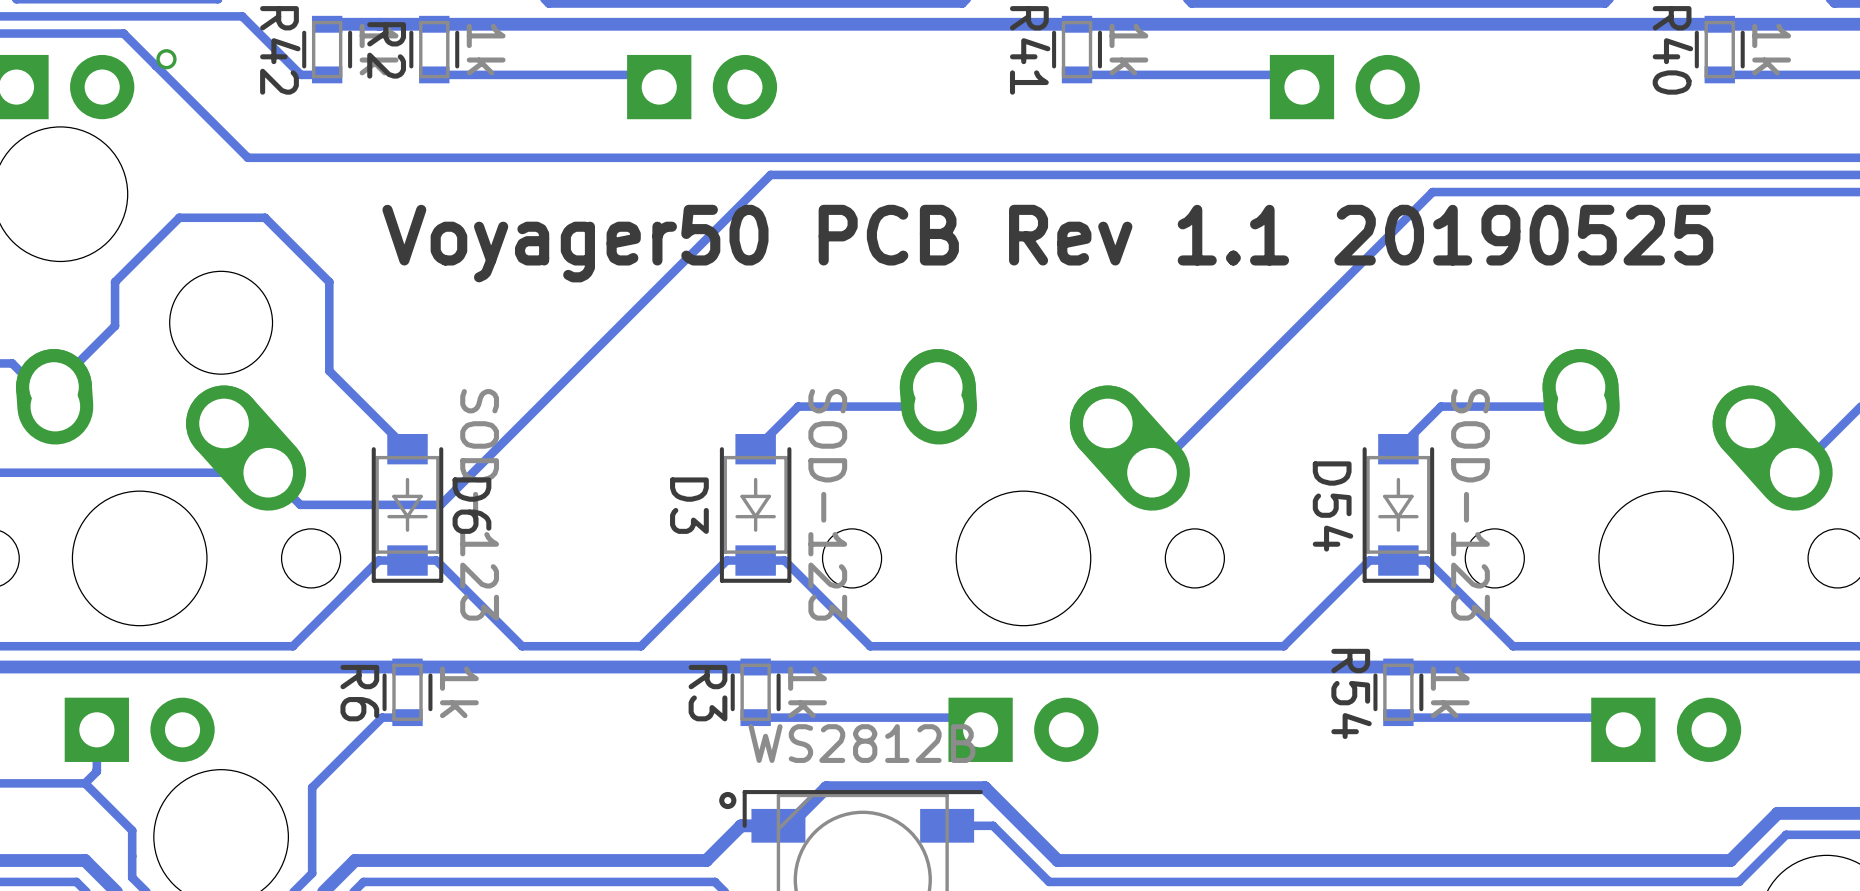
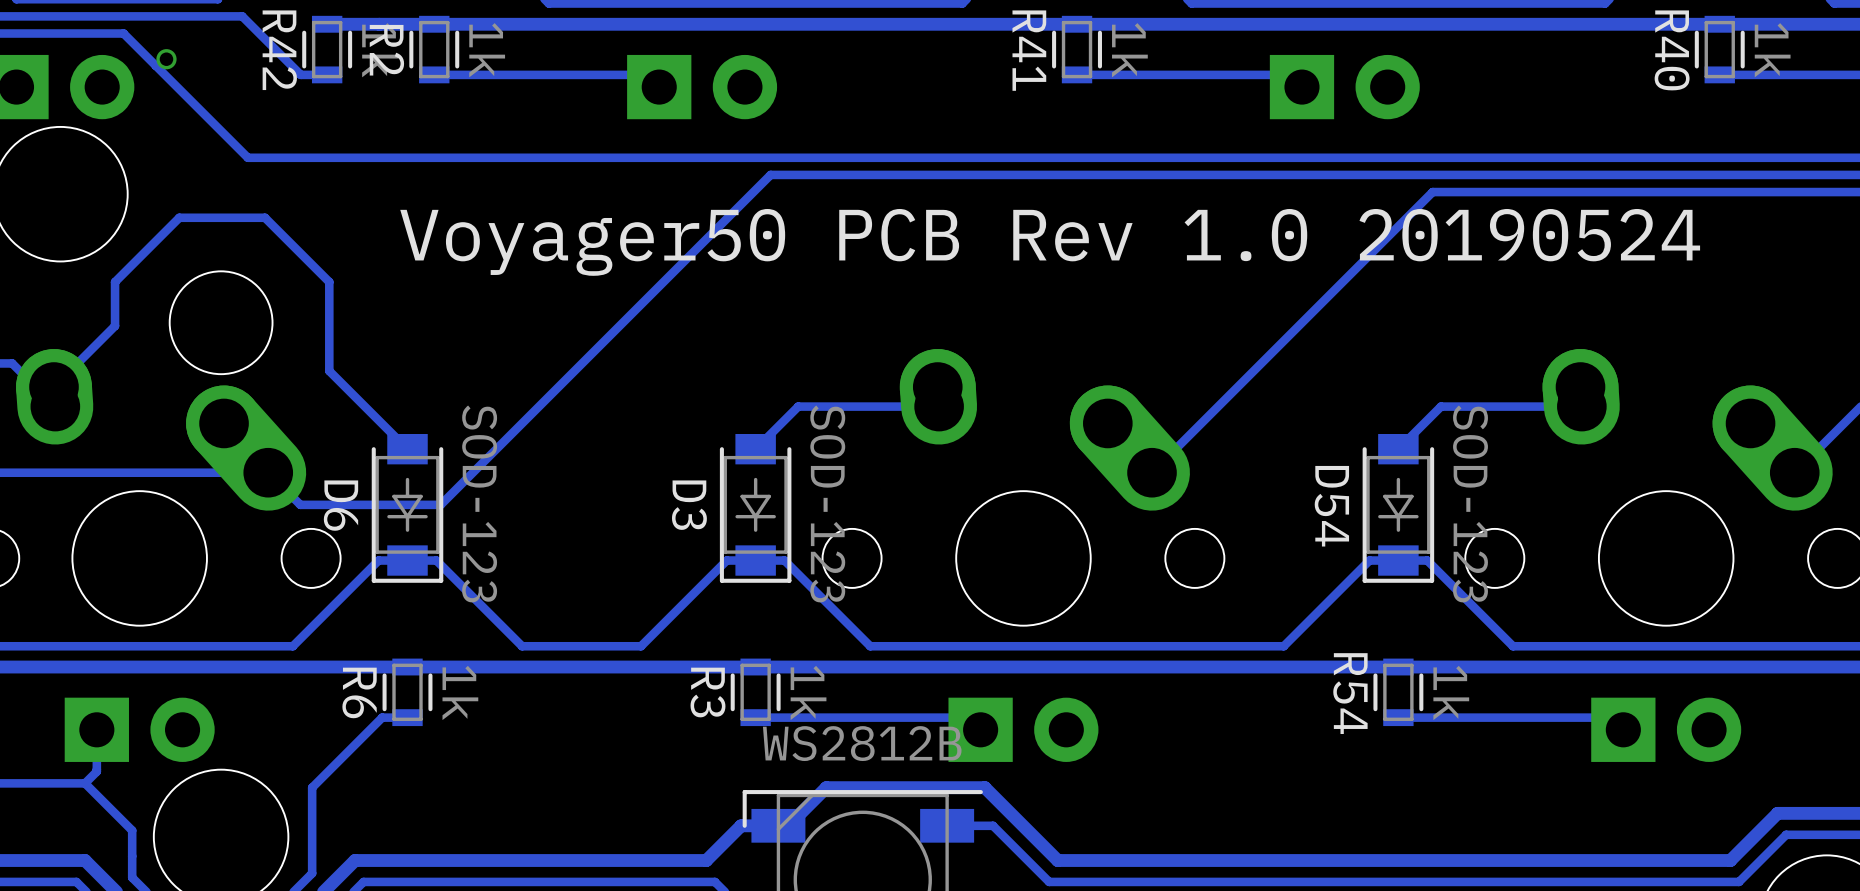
text: Voyager50 PCB Rev 1.1 20190525 (1047, 243) -> Voyager50 PCB Rev 1.0 20190524 (1050, 242)
D6 name position: D6 (471, 505) -> D6 (340, 505)
drawing: [719, 791, 737, 810] -> none

